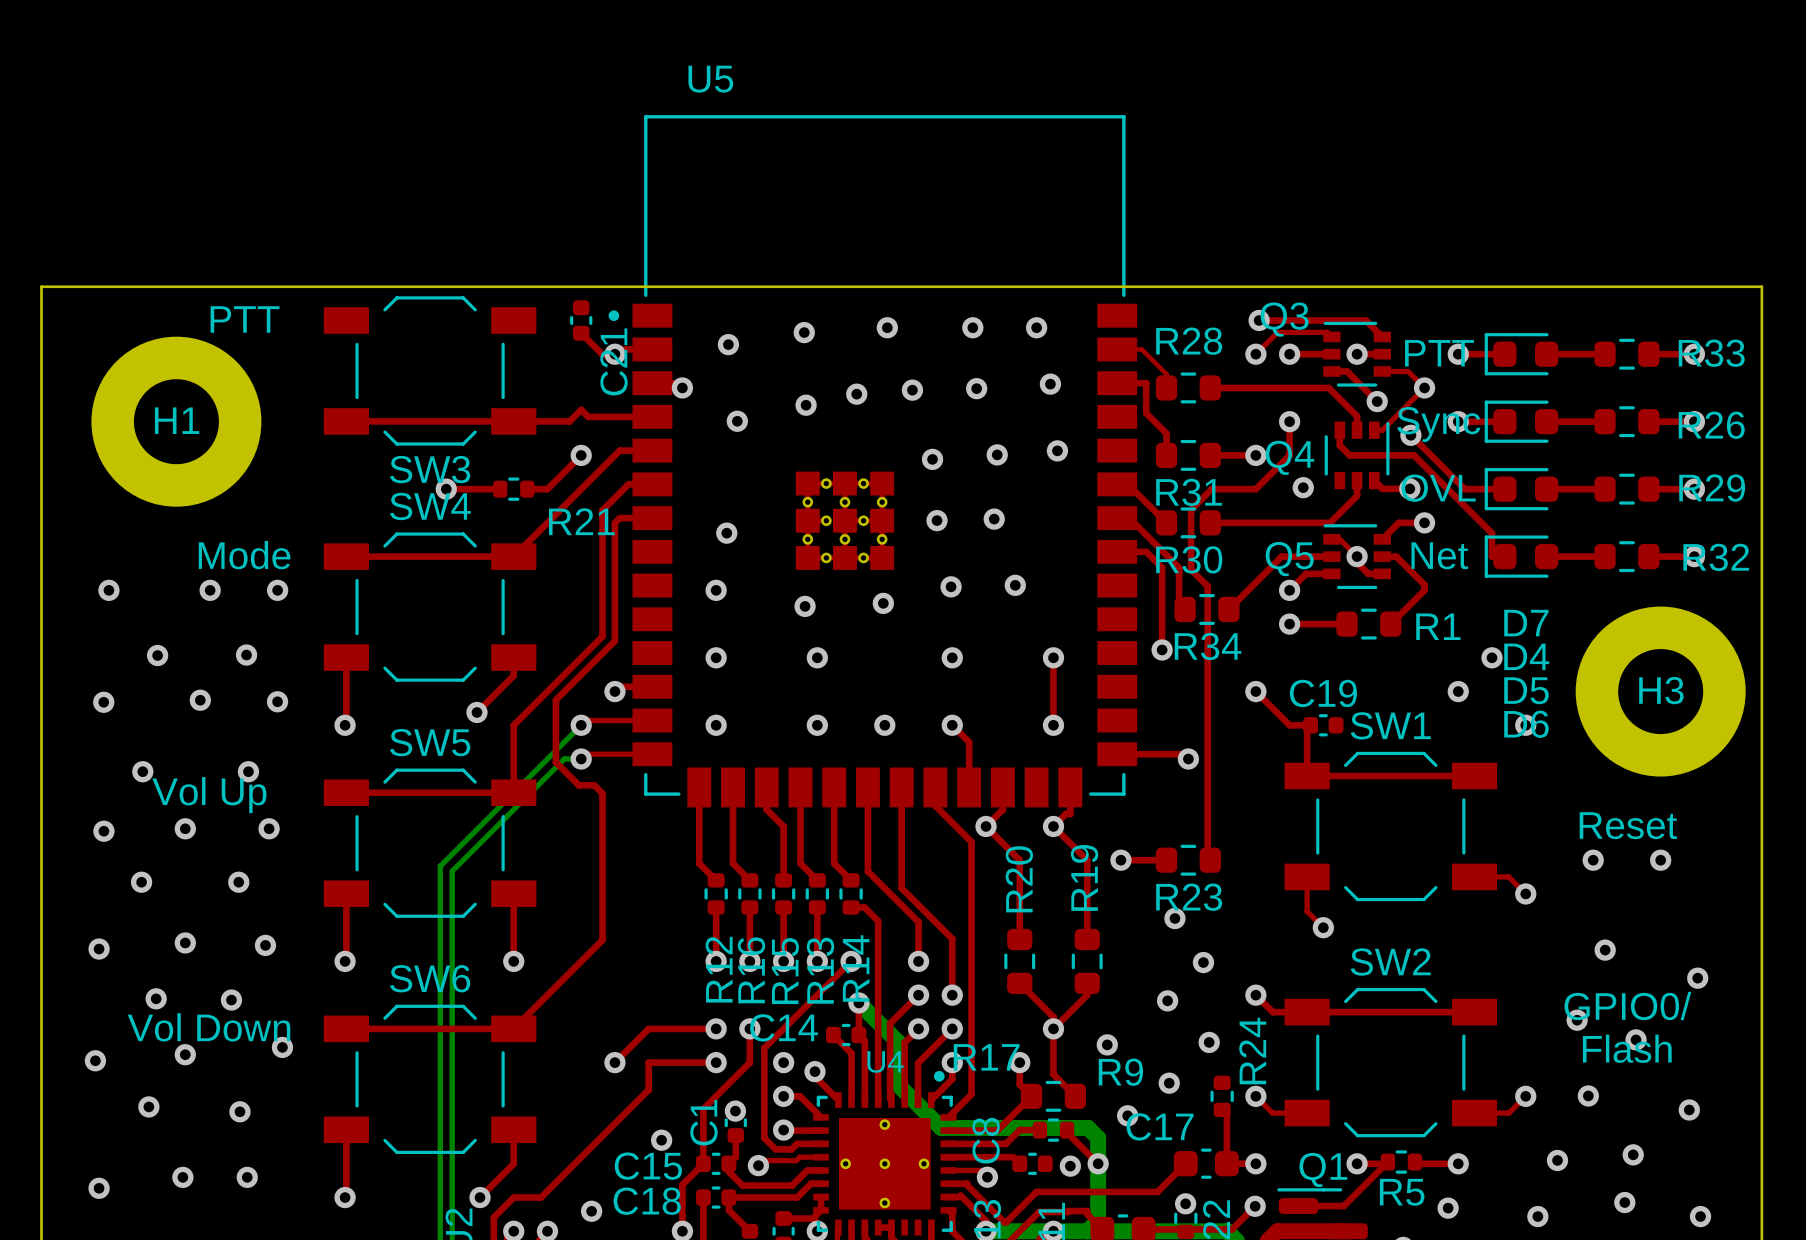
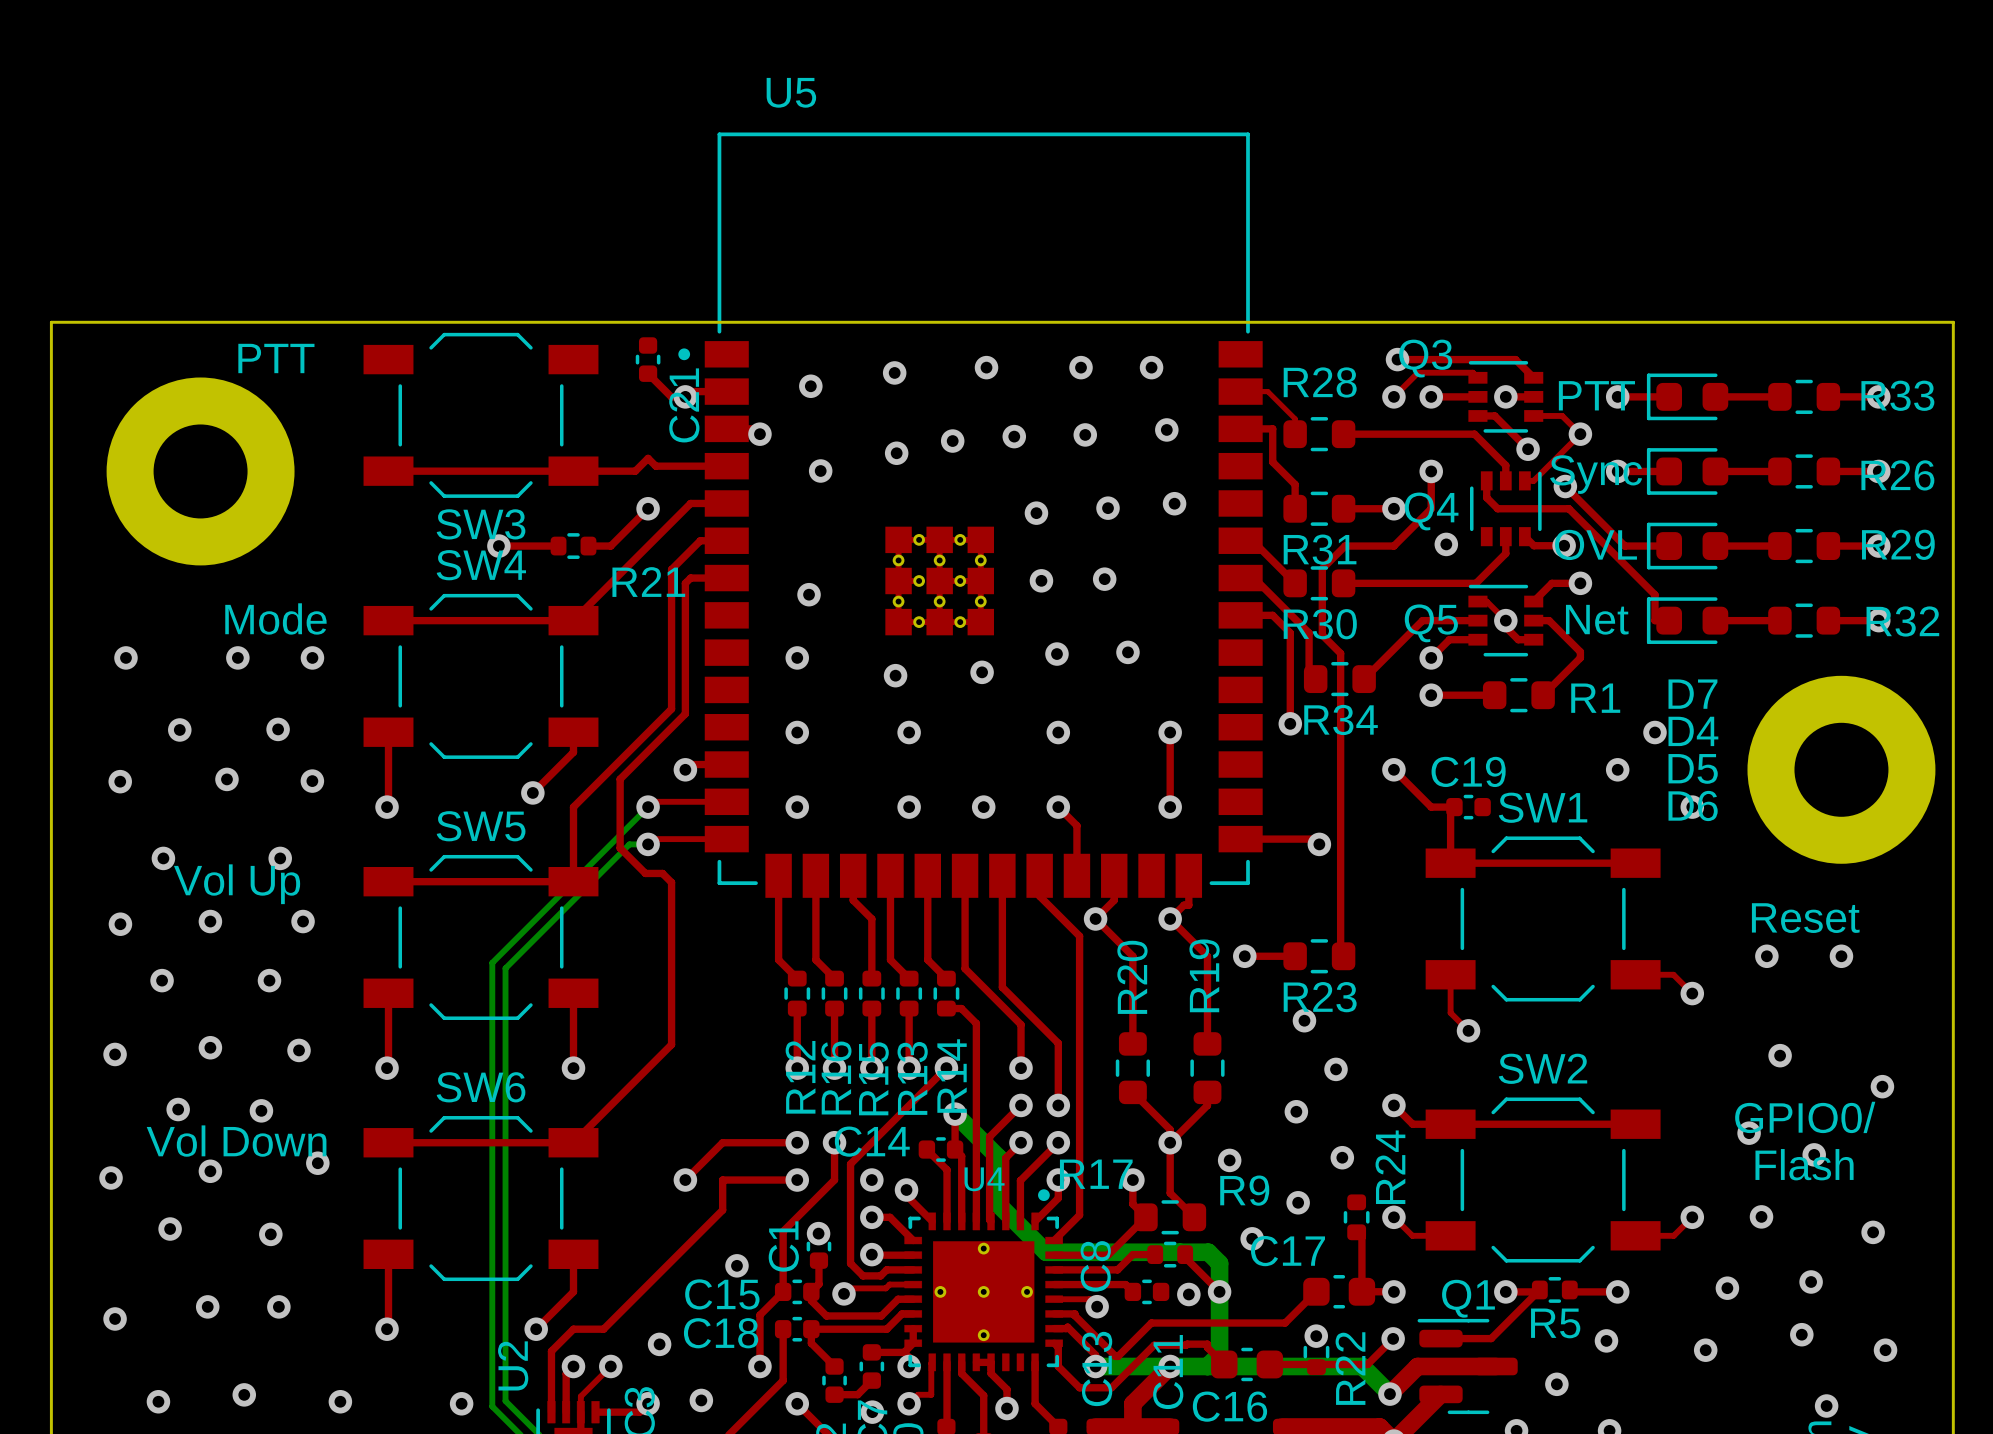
H1 name: H1 (177, 420) -> none
H3 name: H3 (1661, 690) -> none

